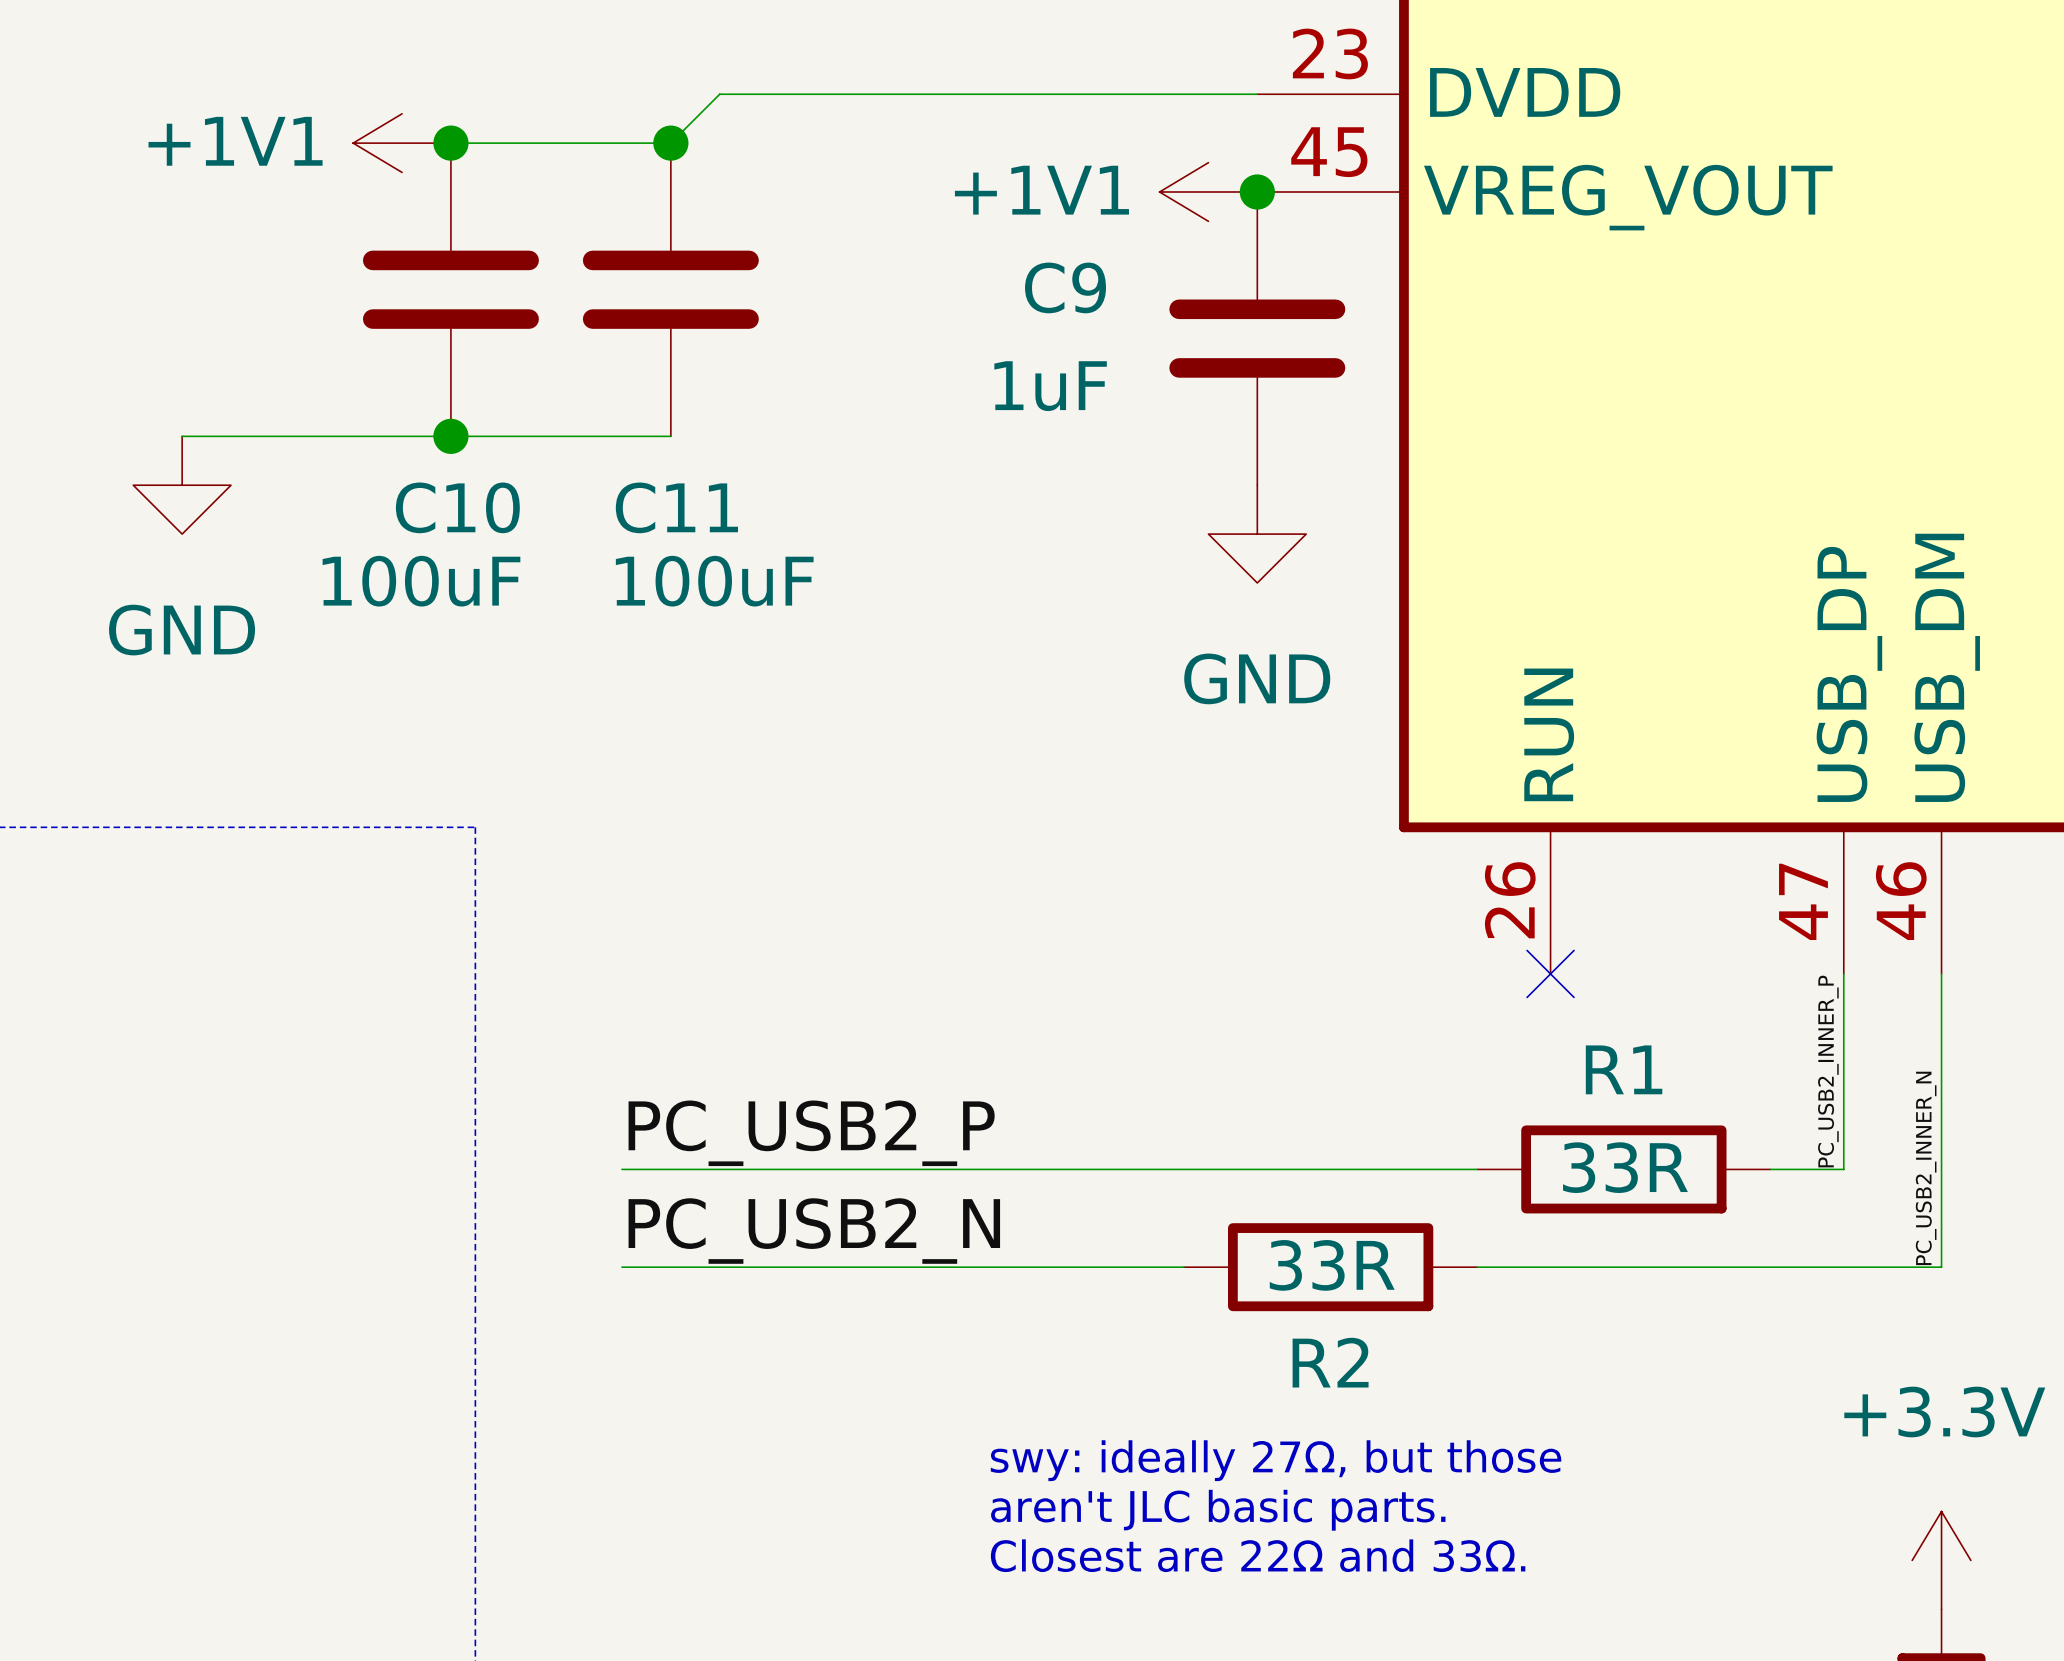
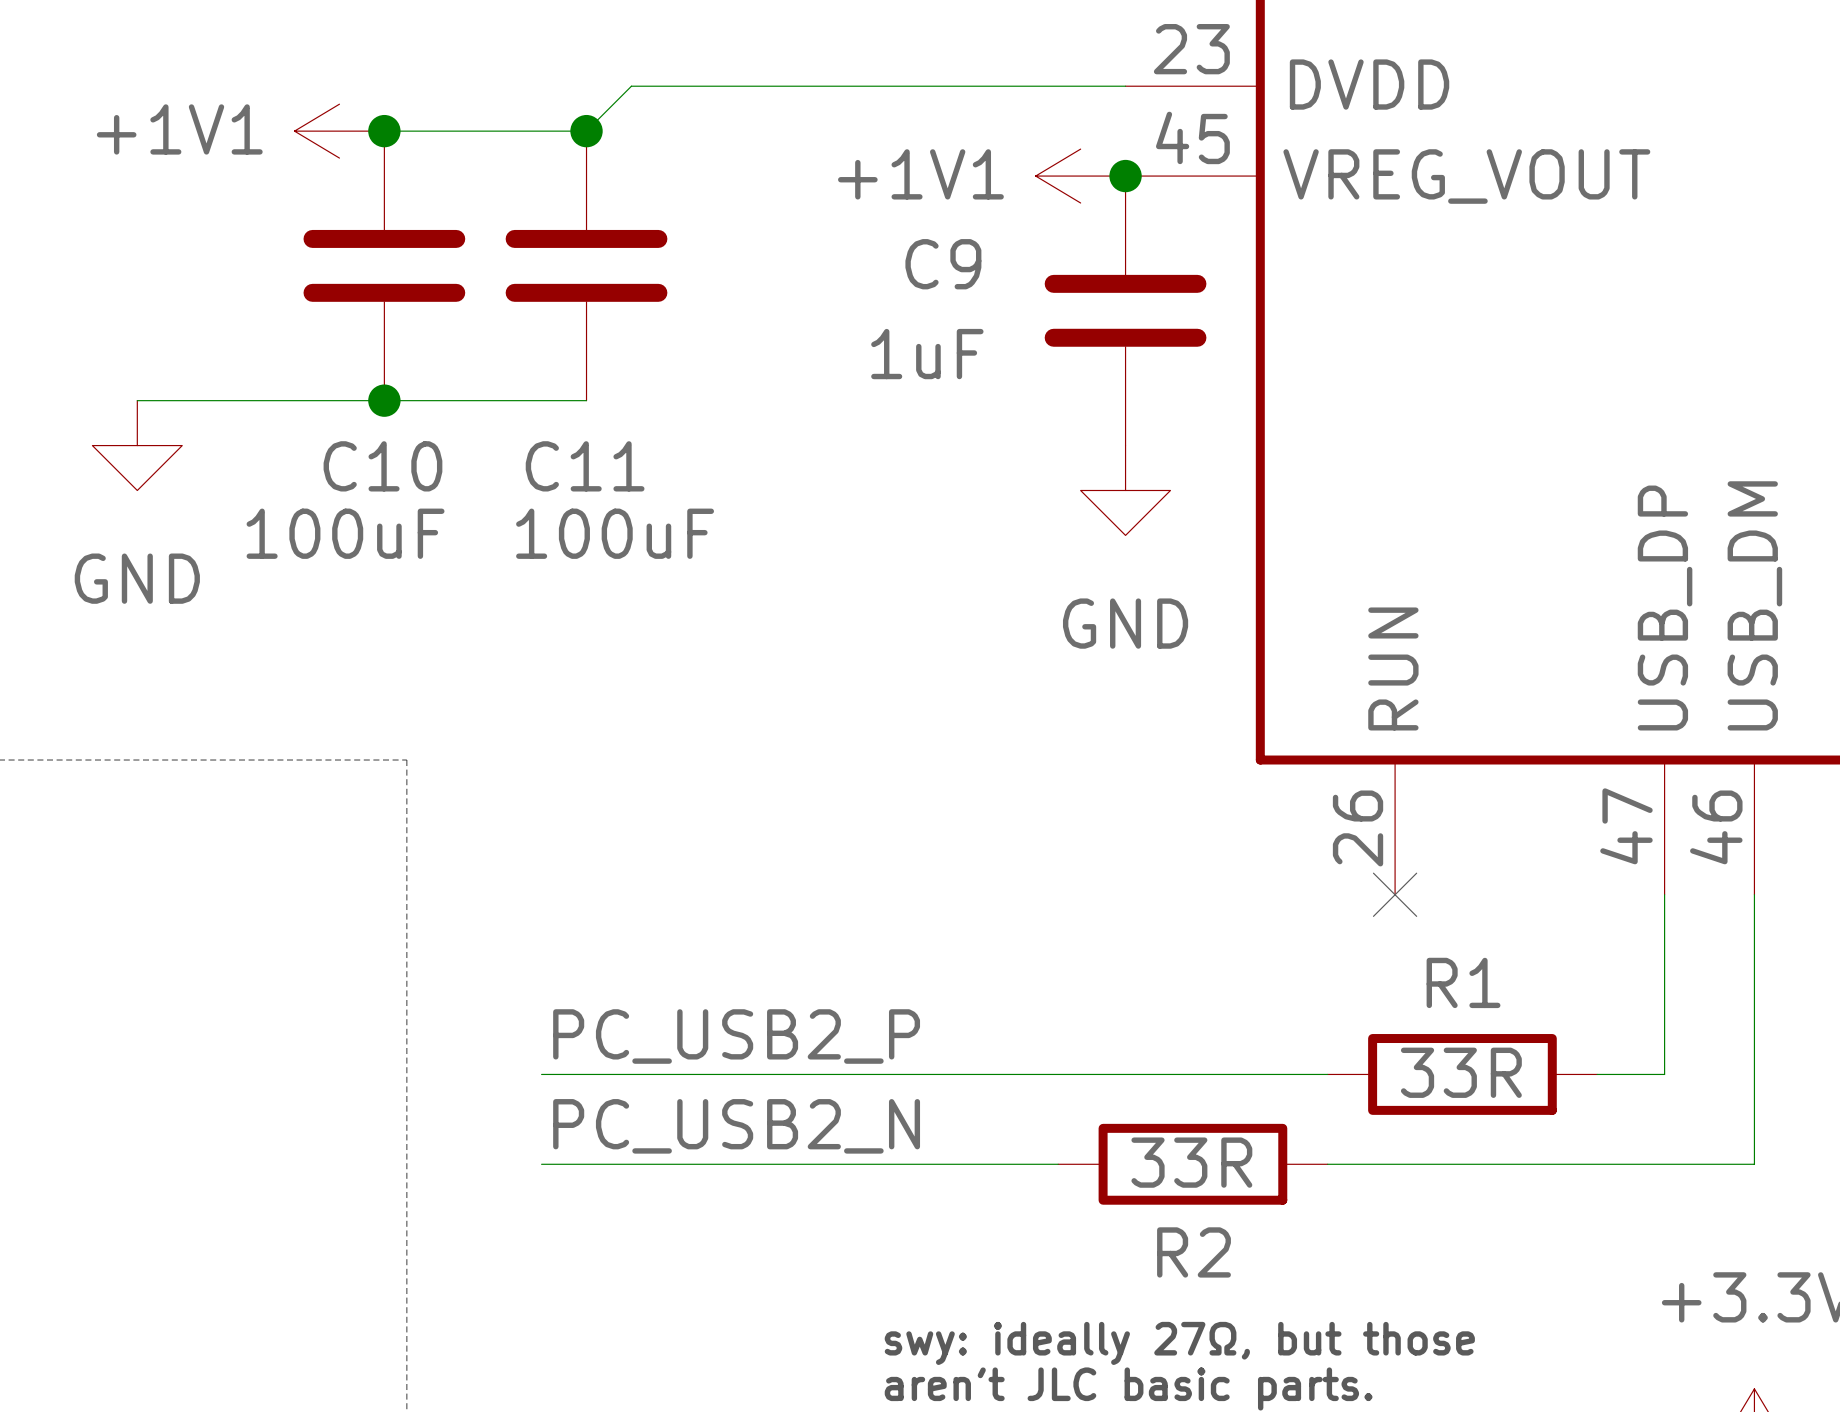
label: PC_USB2_INNER_P (1828, 1071) -> none
label: PC_USB2_INNER_N (1926, 1168) -> none

